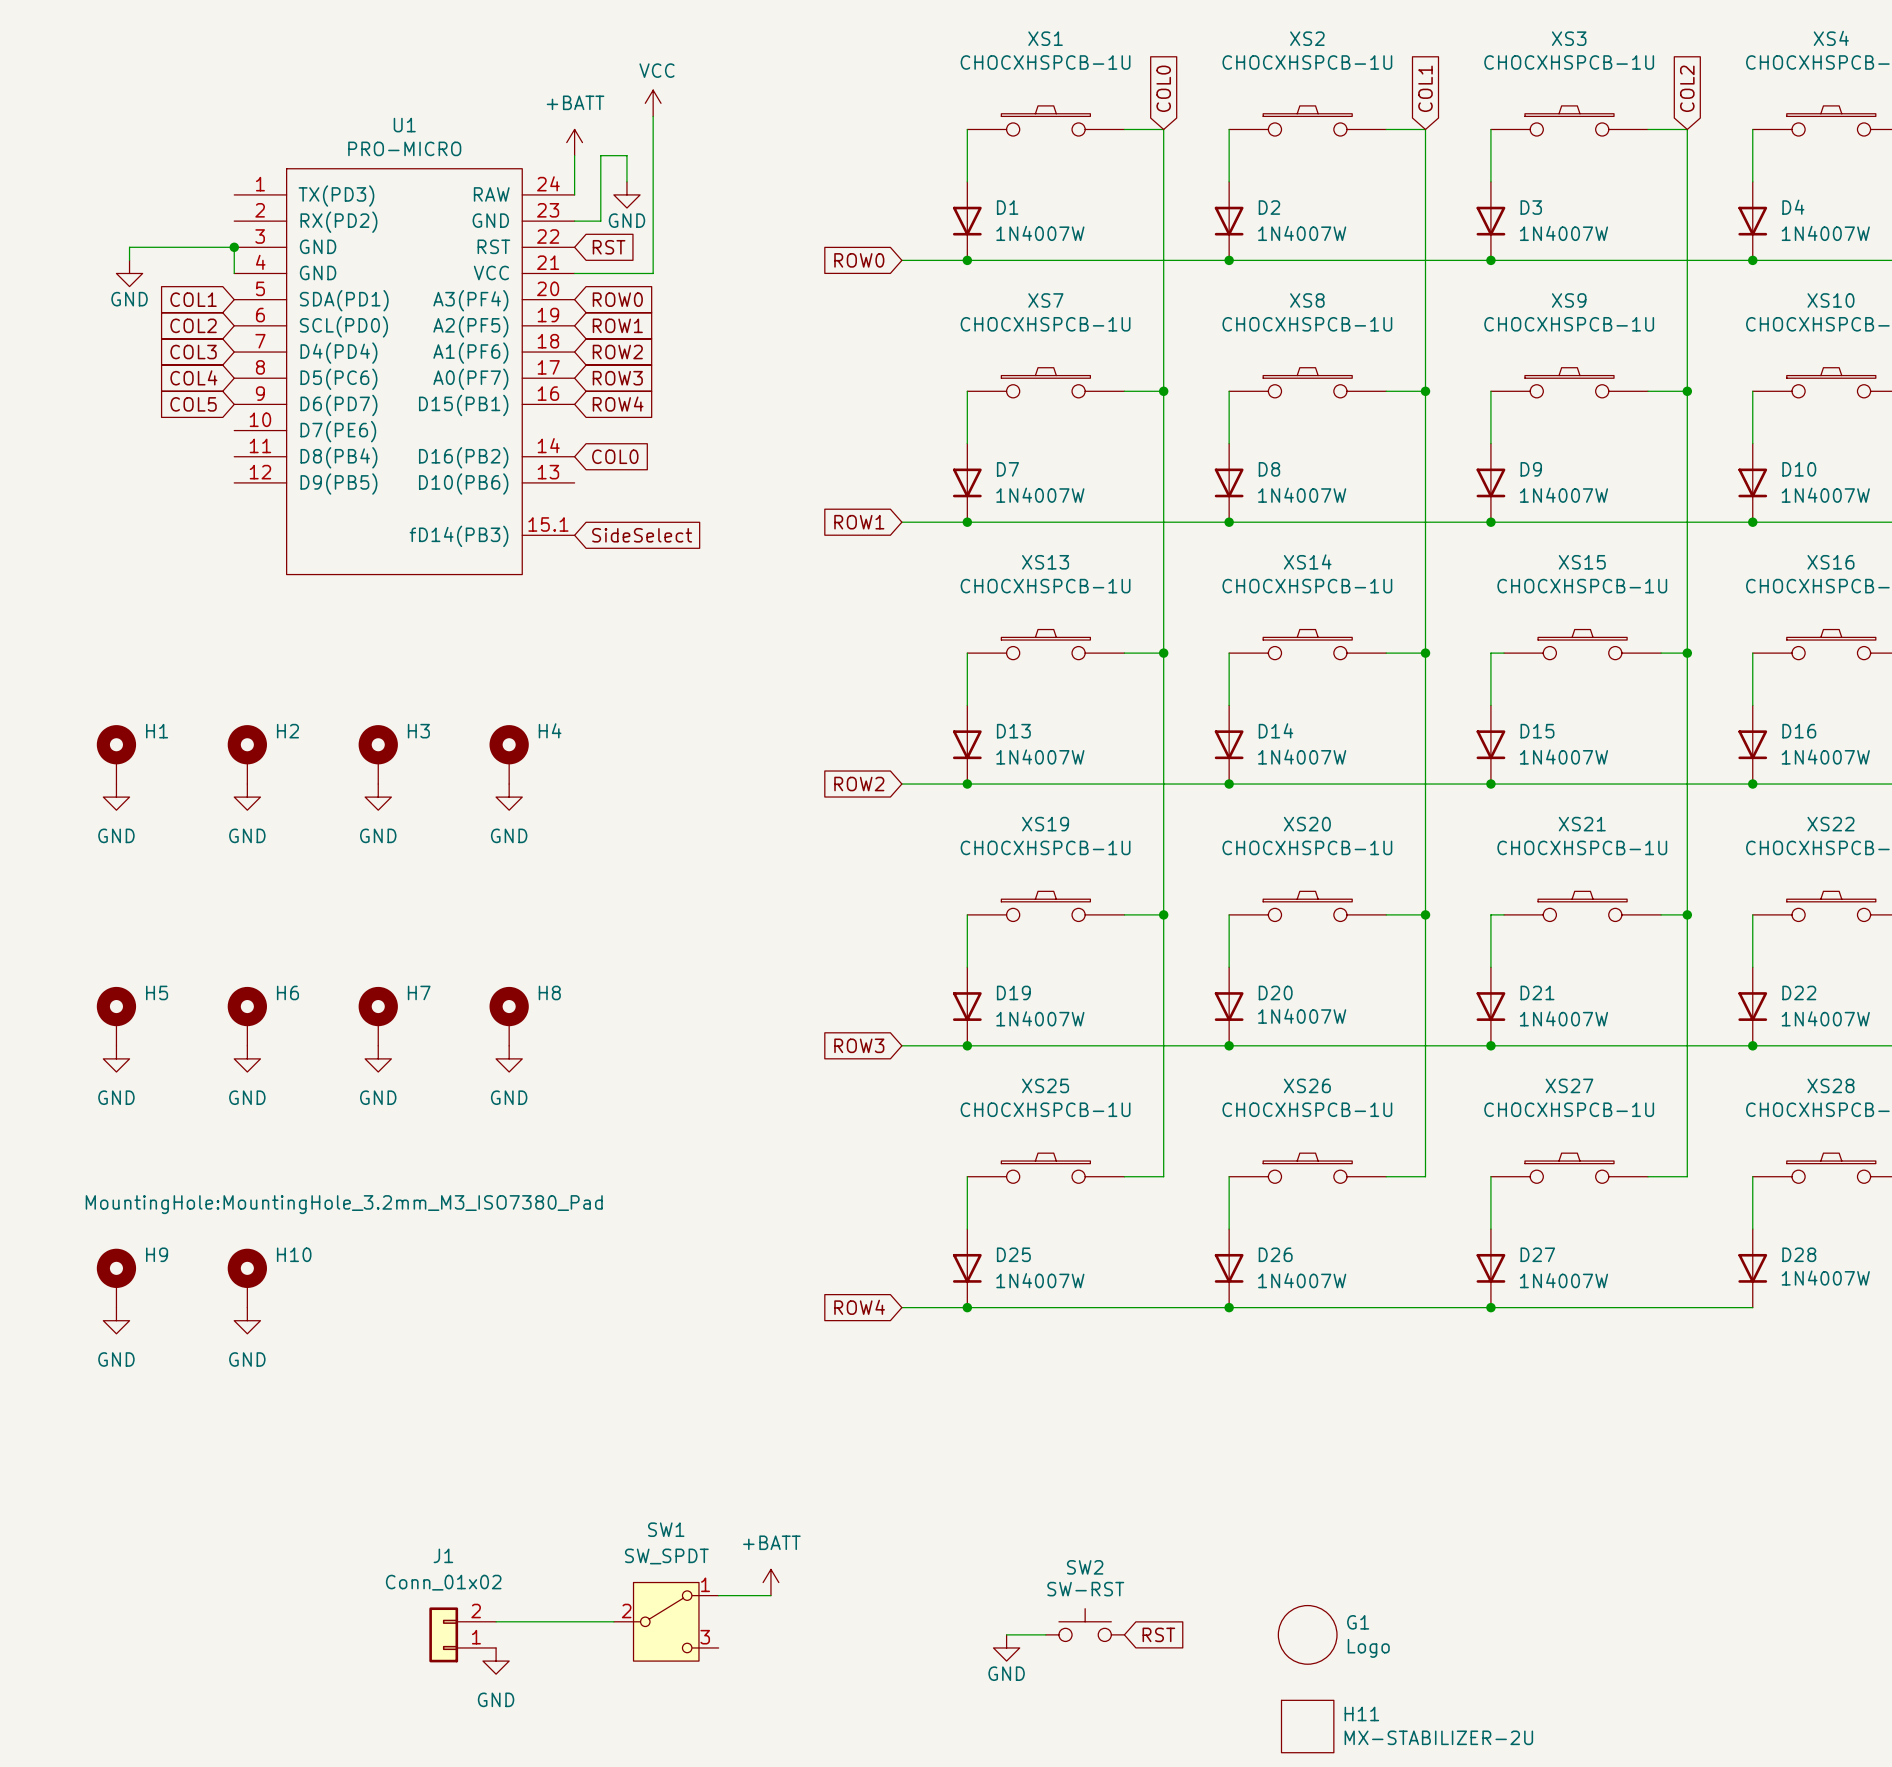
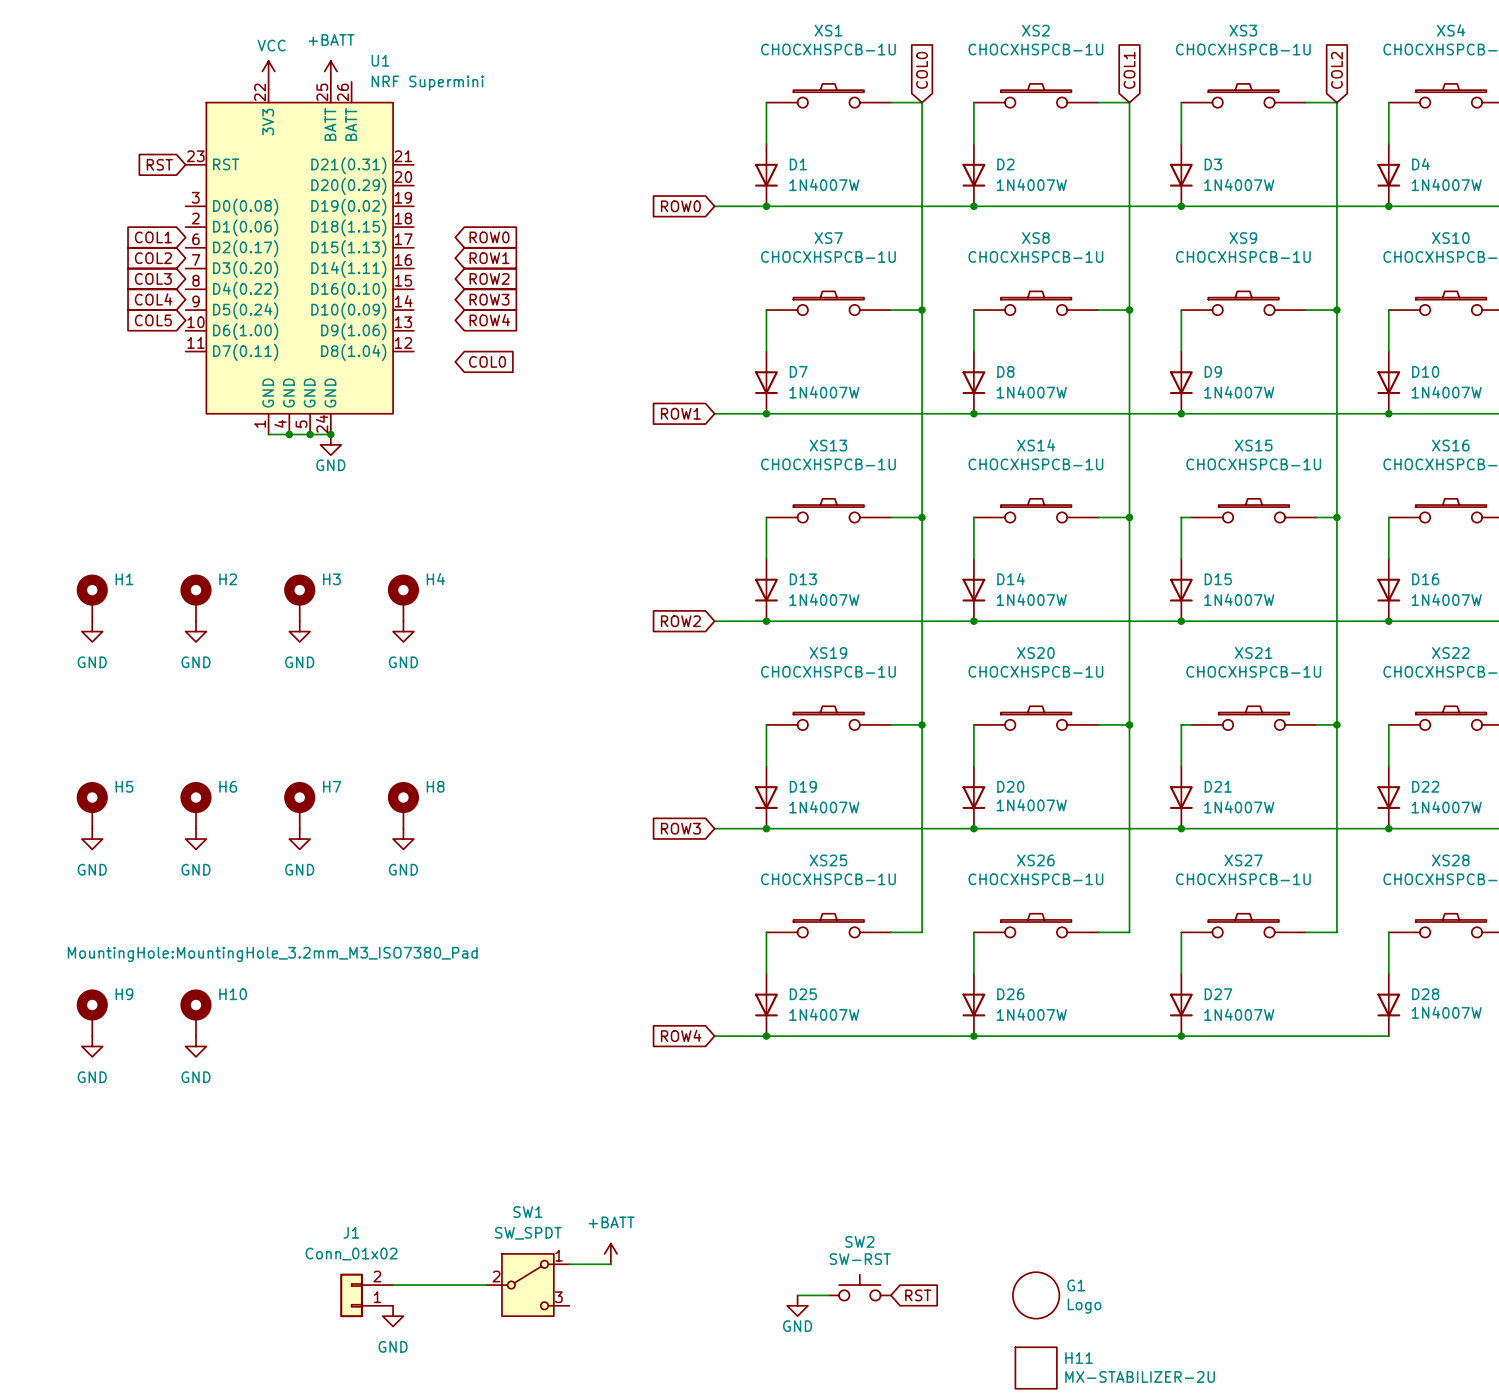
power symbol: none -> VCC (268, 71)
power symbol: VCC (653, 103) -> none
wire: (653, 116) (653, 273) (574, 273) -> none
U1 name position: U1 (404, 125) -> U1 (380, 60)
power symbol position: +BATT (574, 142) -> +BATT (330, 71)
U1 value: PRO-MICRO (404, 148) -> NRF Supermini (427, 83)
wire: (574, 155) (574, 194) -> none
U1 symbol: [234, 168, 575, 575] -> [185, 81, 414, 435]
wire: (626, 181) (626, 155) (600, 155) (600, 221) (574, 221) -> none
power symbol: GND (626, 194) -> none
global label: none -> RST (159, 164)
junction: (234, 247) -> none
global label: RST (609, 247) -> none
wire: (129, 260) (129, 247) (234, 247) (234, 273) -> none
power symbol: GND (129, 273) -> none
global label: SideSelect (642, 535) -> none
wire: none -> (268, 434) (330, 434)
junction: none -> (289, 434)
junction: none -> (310, 434)
junction: none -> (330, 434)
power symbol: none -> GND (330, 444)

